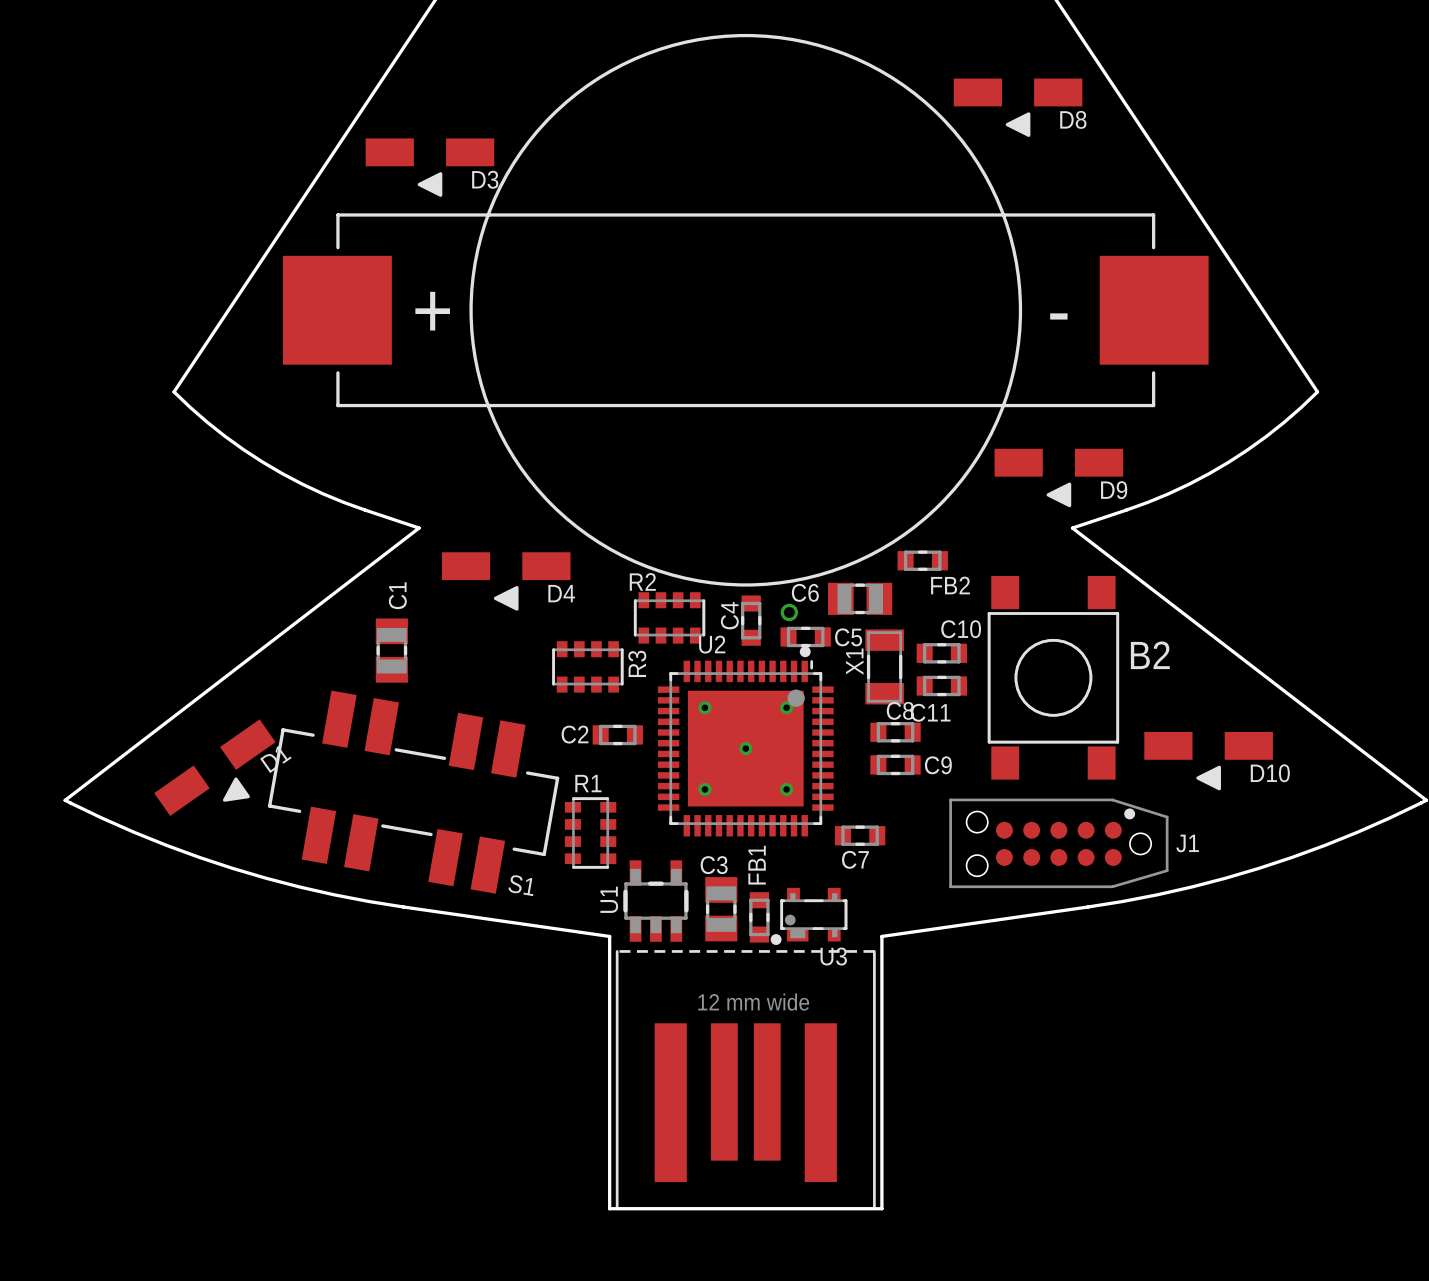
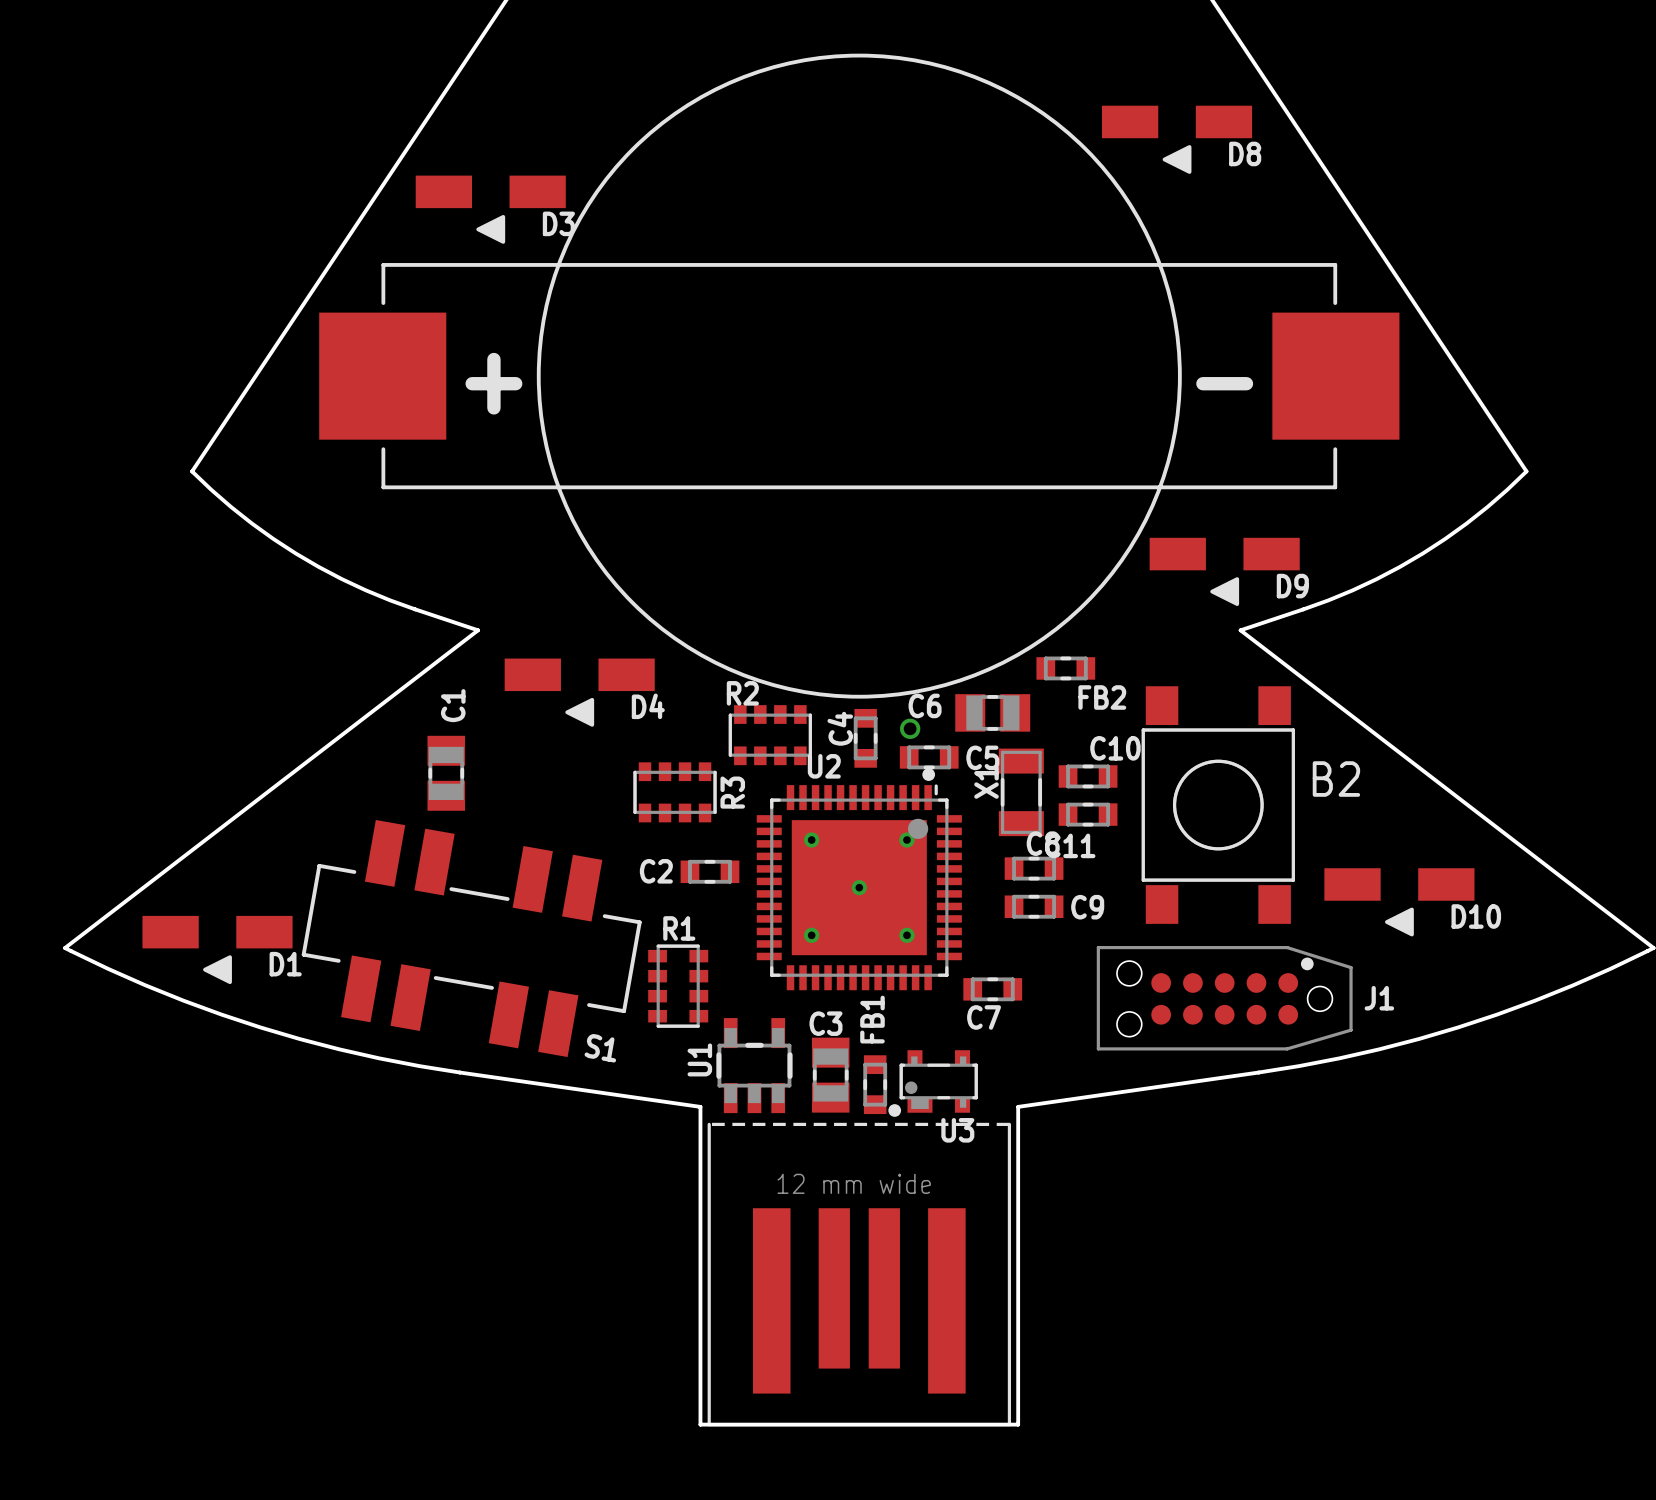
D1 rotation: 0° (214, 767) -> 35° clockwise (217, 949)

